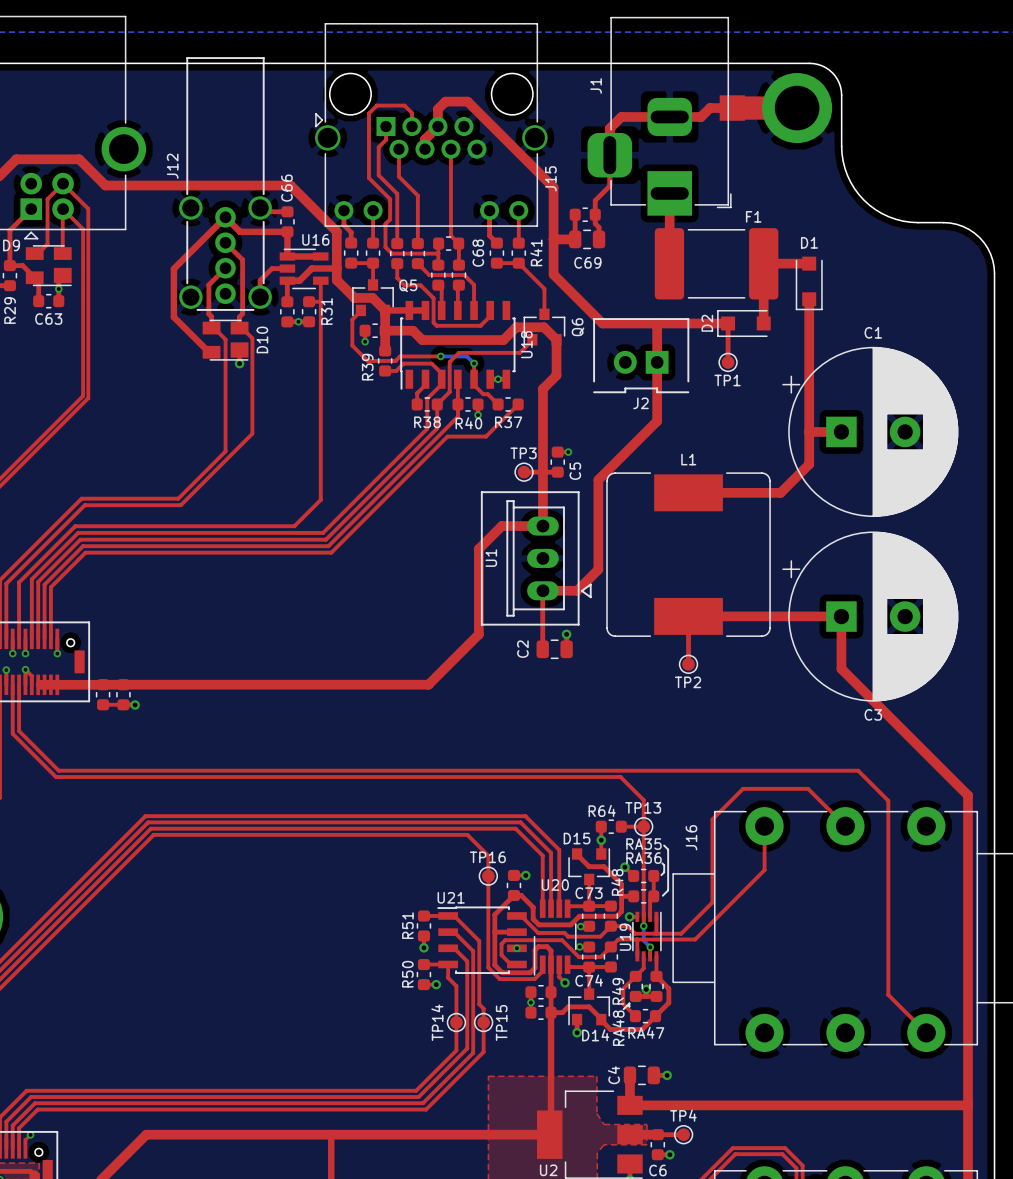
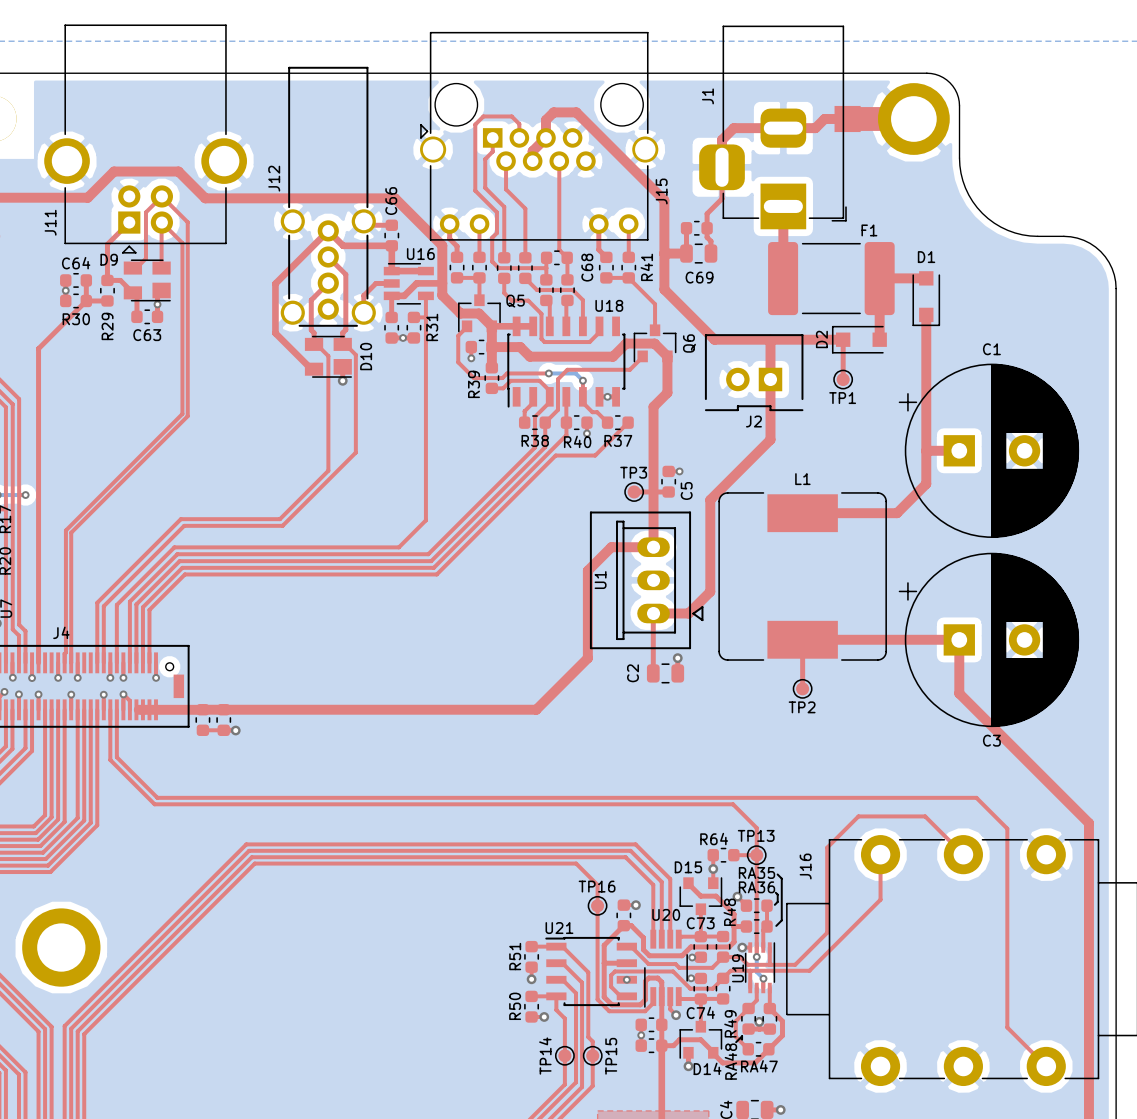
U18 name rotation: 0° (526, 344) -> 90° clockwise (609, 305)
U18 name position: U18 (526, 344) -> U18 (609, 305)

